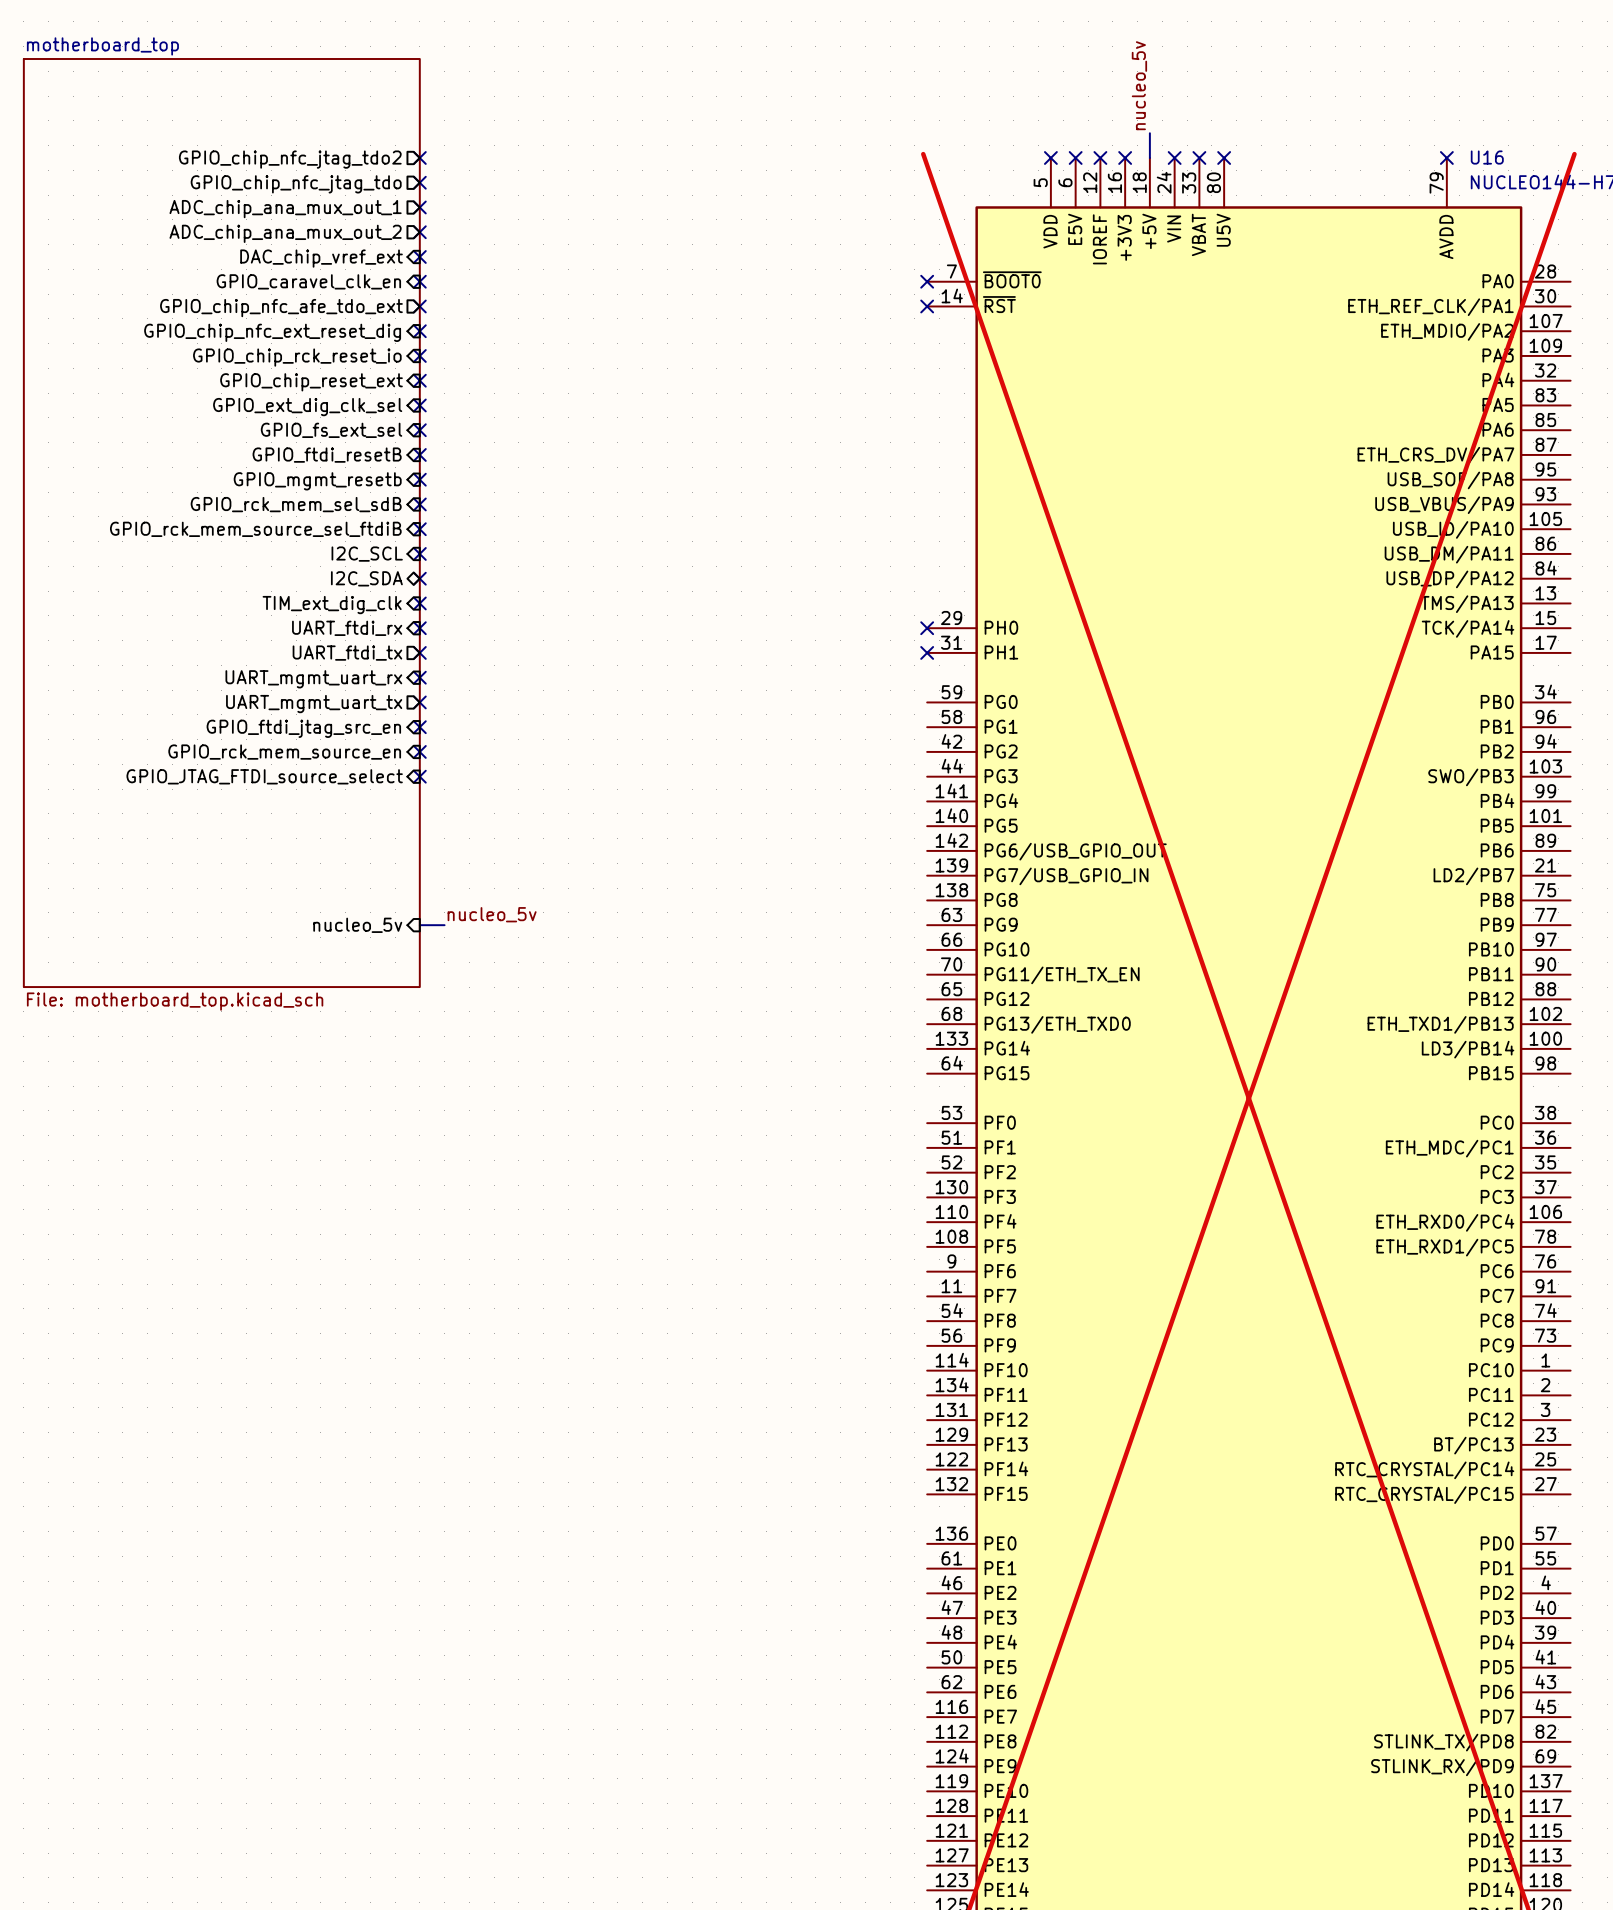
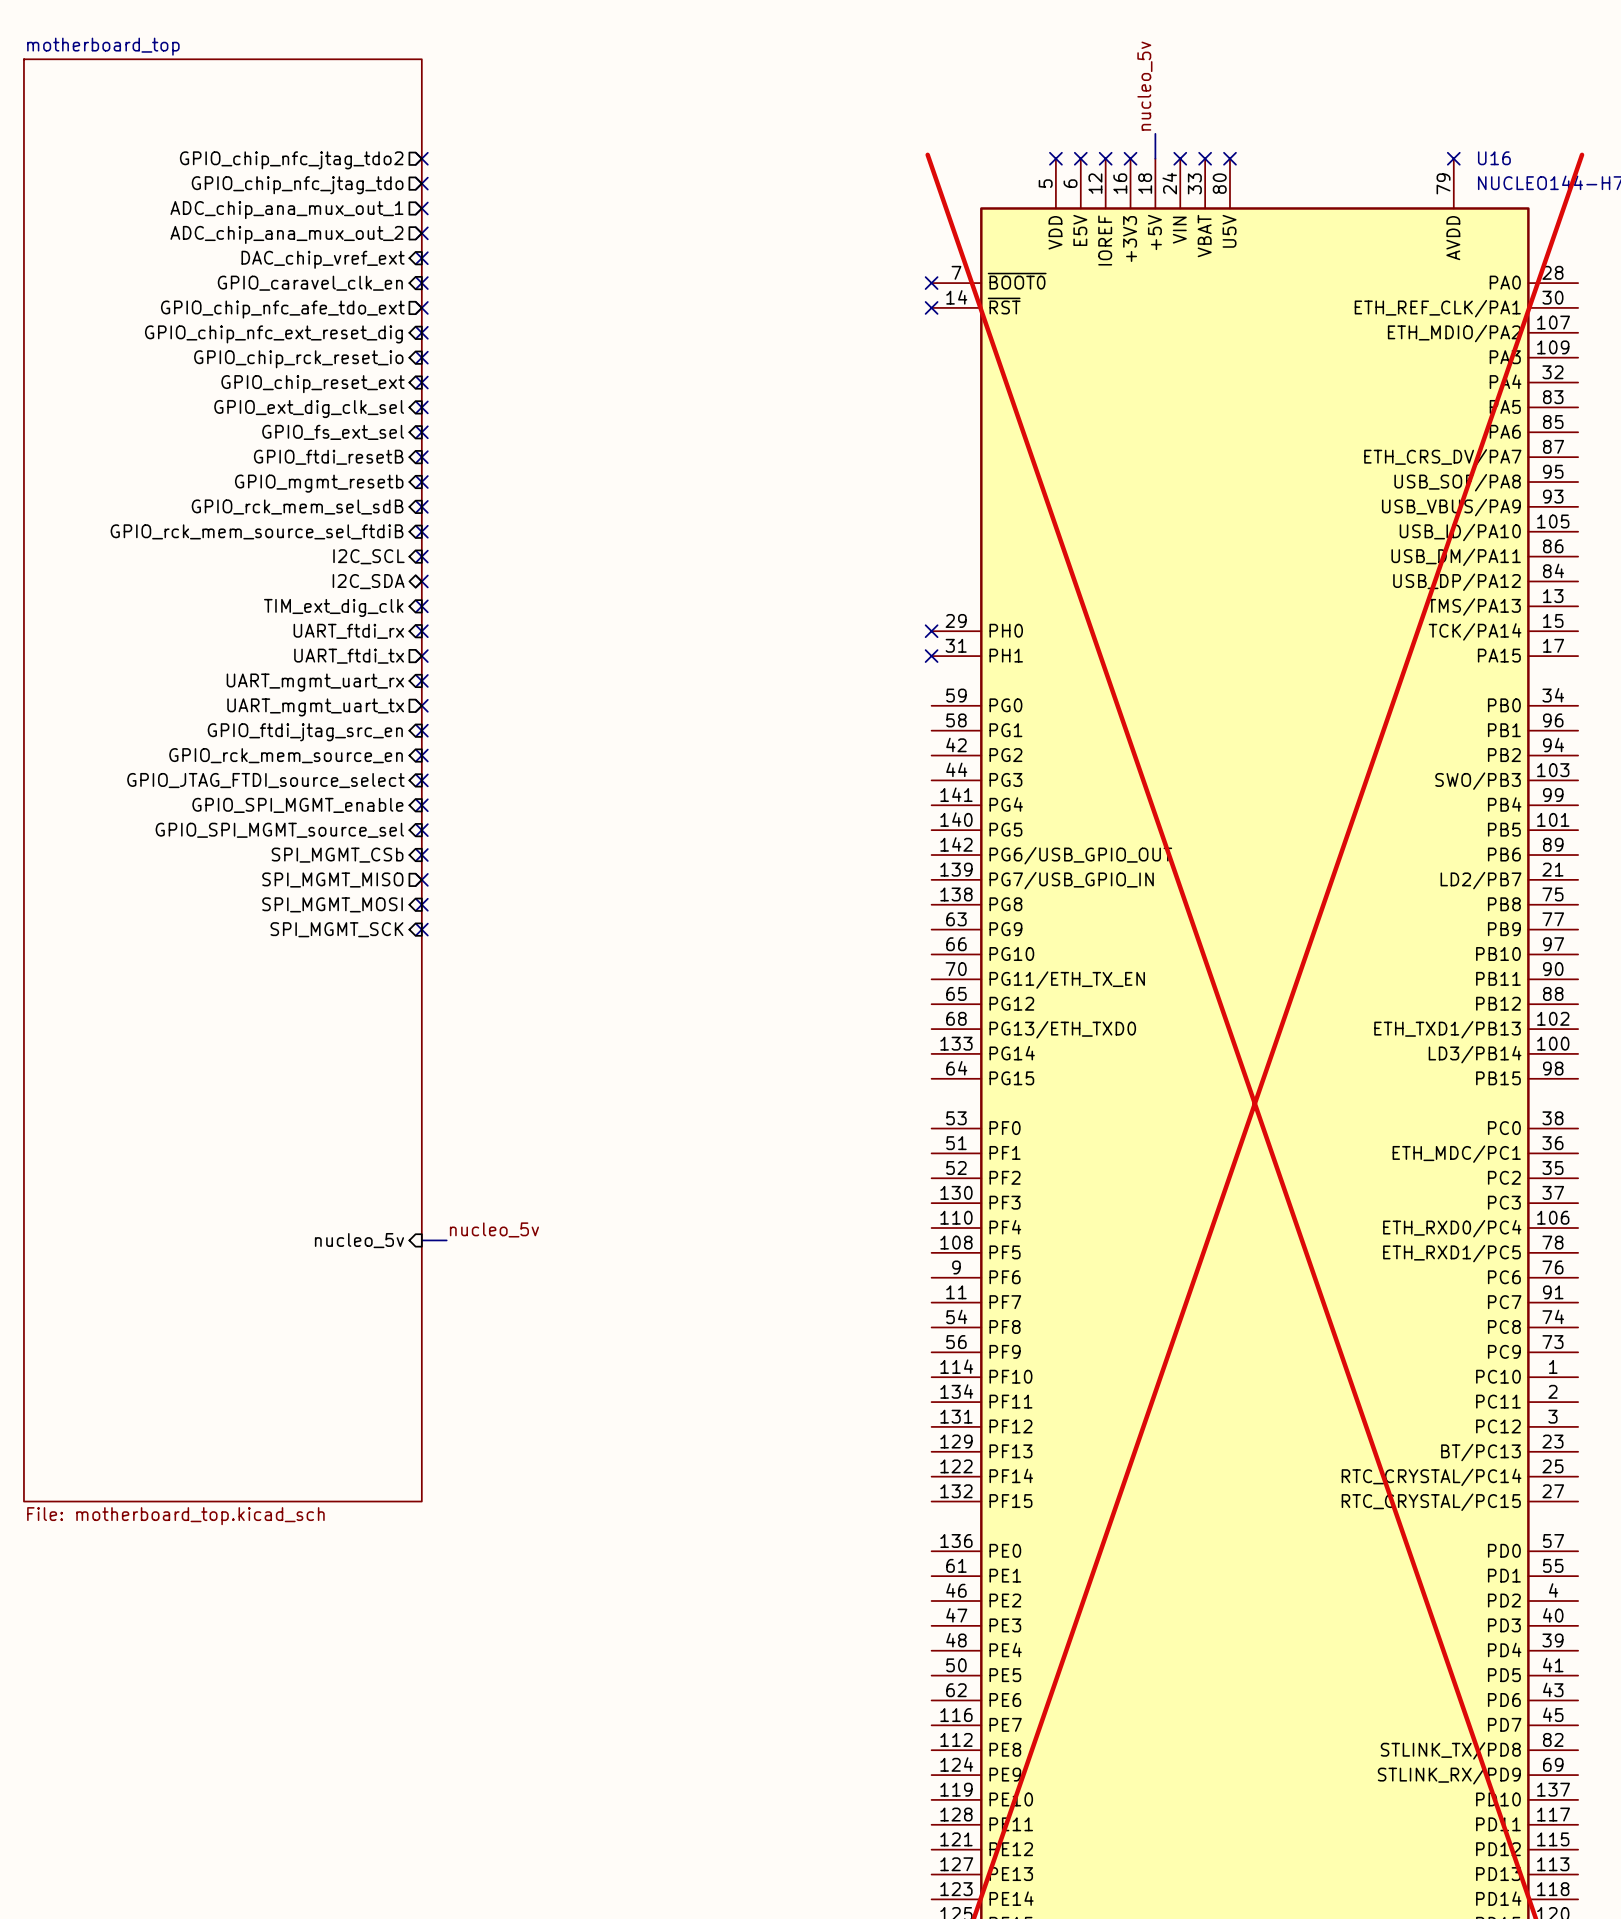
sheet motherboard_top: File: motherboard_top.kicad_sch (221, 523) -> none
sheet motherboard_top: none -> File: motherboard_top.kicad_sch (222, 780)
sheet pin: none -> GPIO_SPI_MGMT_enable (297, 805)
no-connect mark: none -> (421, 805)
sheet pin: none -> GPIO_SPI_MGMT_source_sel (279, 830)
no-connect mark: none -> (421, 830)
no-connect mark: none -> (421, 855)
sheet pin: none -> SPI_MGMT_CSb (337, 855)
sheet pin: none -> SPI_MGMT_MISO (332, 880)
no-connect mark: none -> (421, 879)
sheet pin: none -> SPI_MGMT_MOSI (332, 904)
no-connect mark: none -> (421, 904)
label: nucleo_5v (492, 914) -> none
sheet pin: nucleo_5v (357, 925) -> SPI_MGMT_SCK (336, 929)
wire: (419, 925) (444, 925) -> none
no-connect mark: none -> (421, 929)
label: none -> nucleo_5v (494, 1229)
sheet pin: none -> nucleo_5v (359, 1240)
wire: none -> (421, 1240) (446, 1240)

